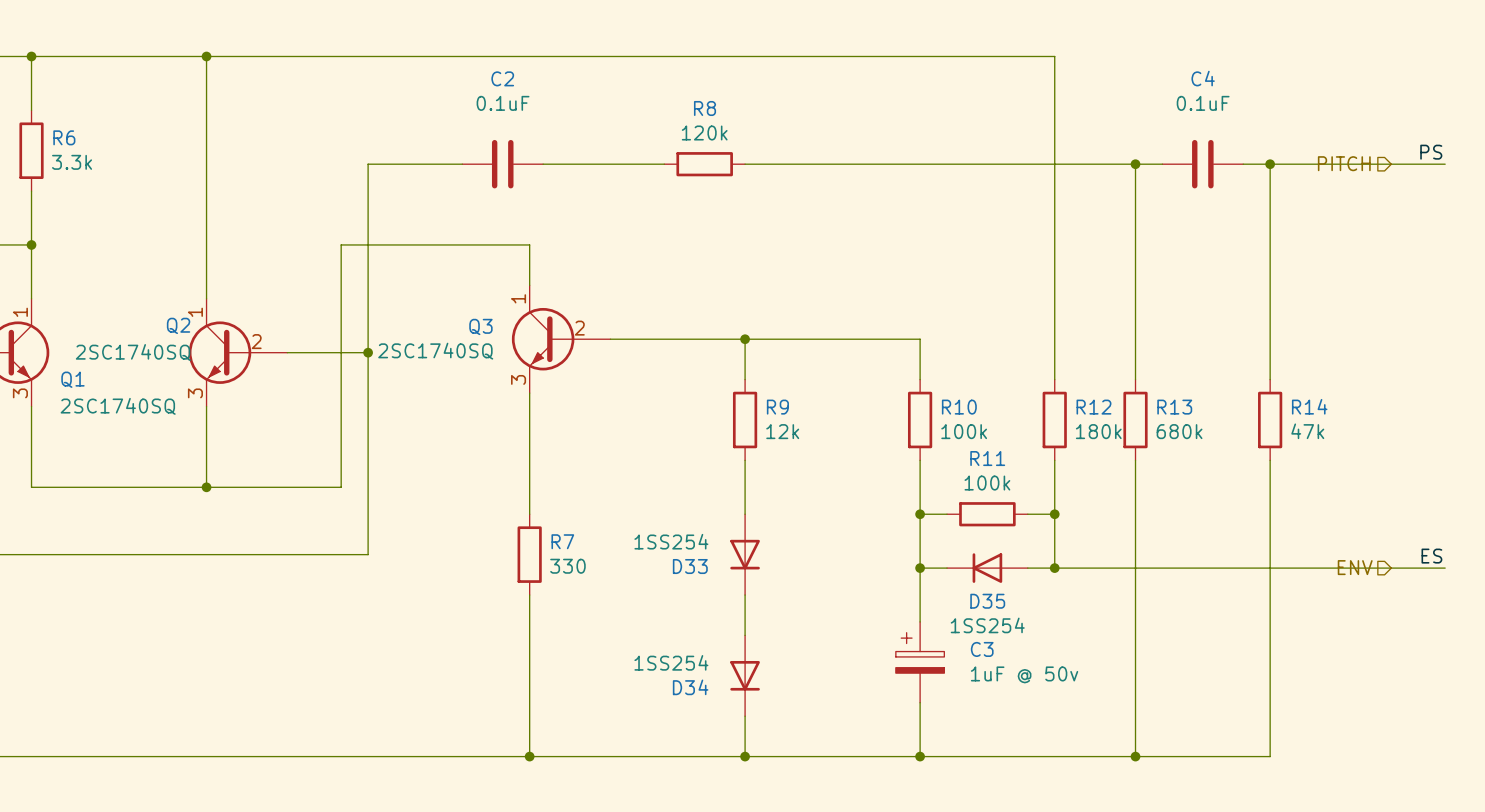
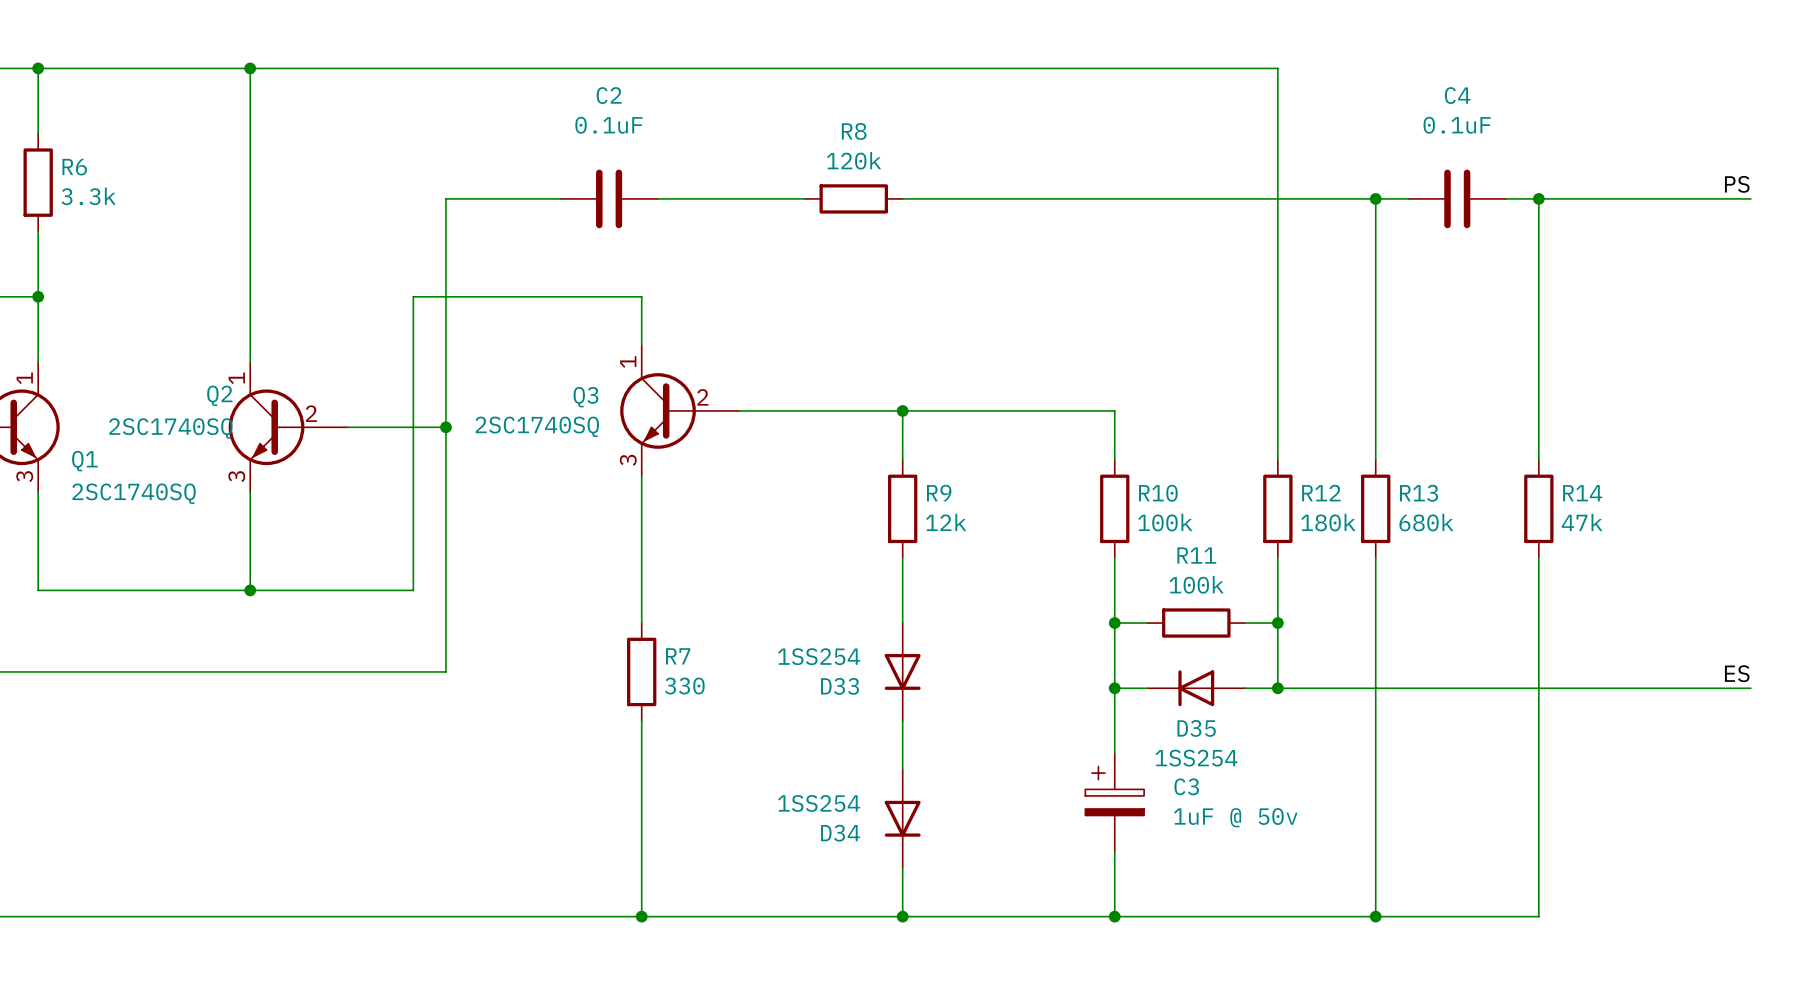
hierarchical label: PITCH (1344, 163) -> none
hierarchical label: ENV (1355, 567) -> none

